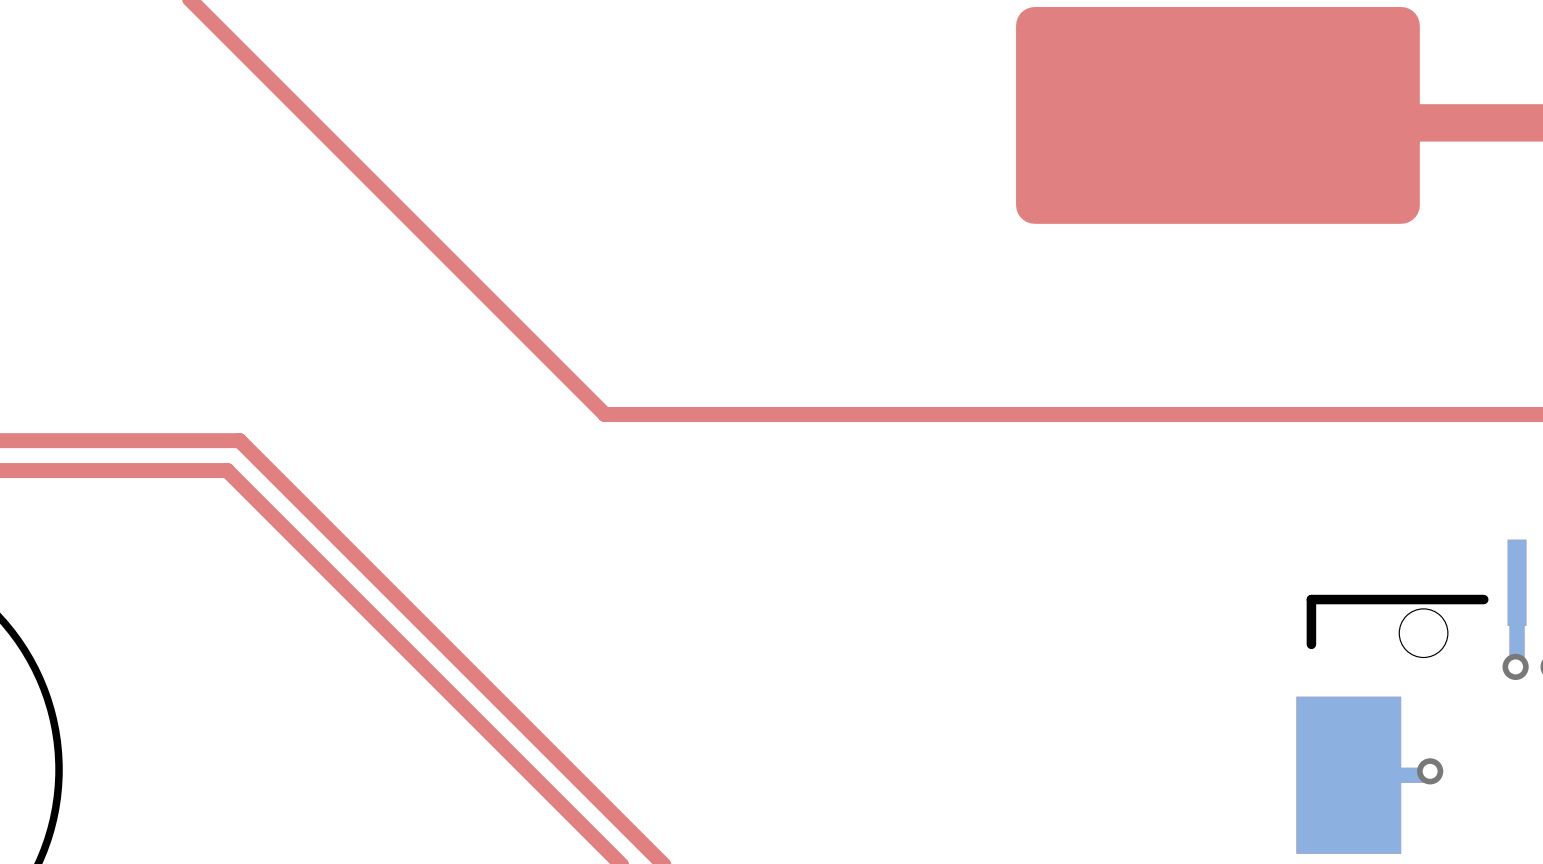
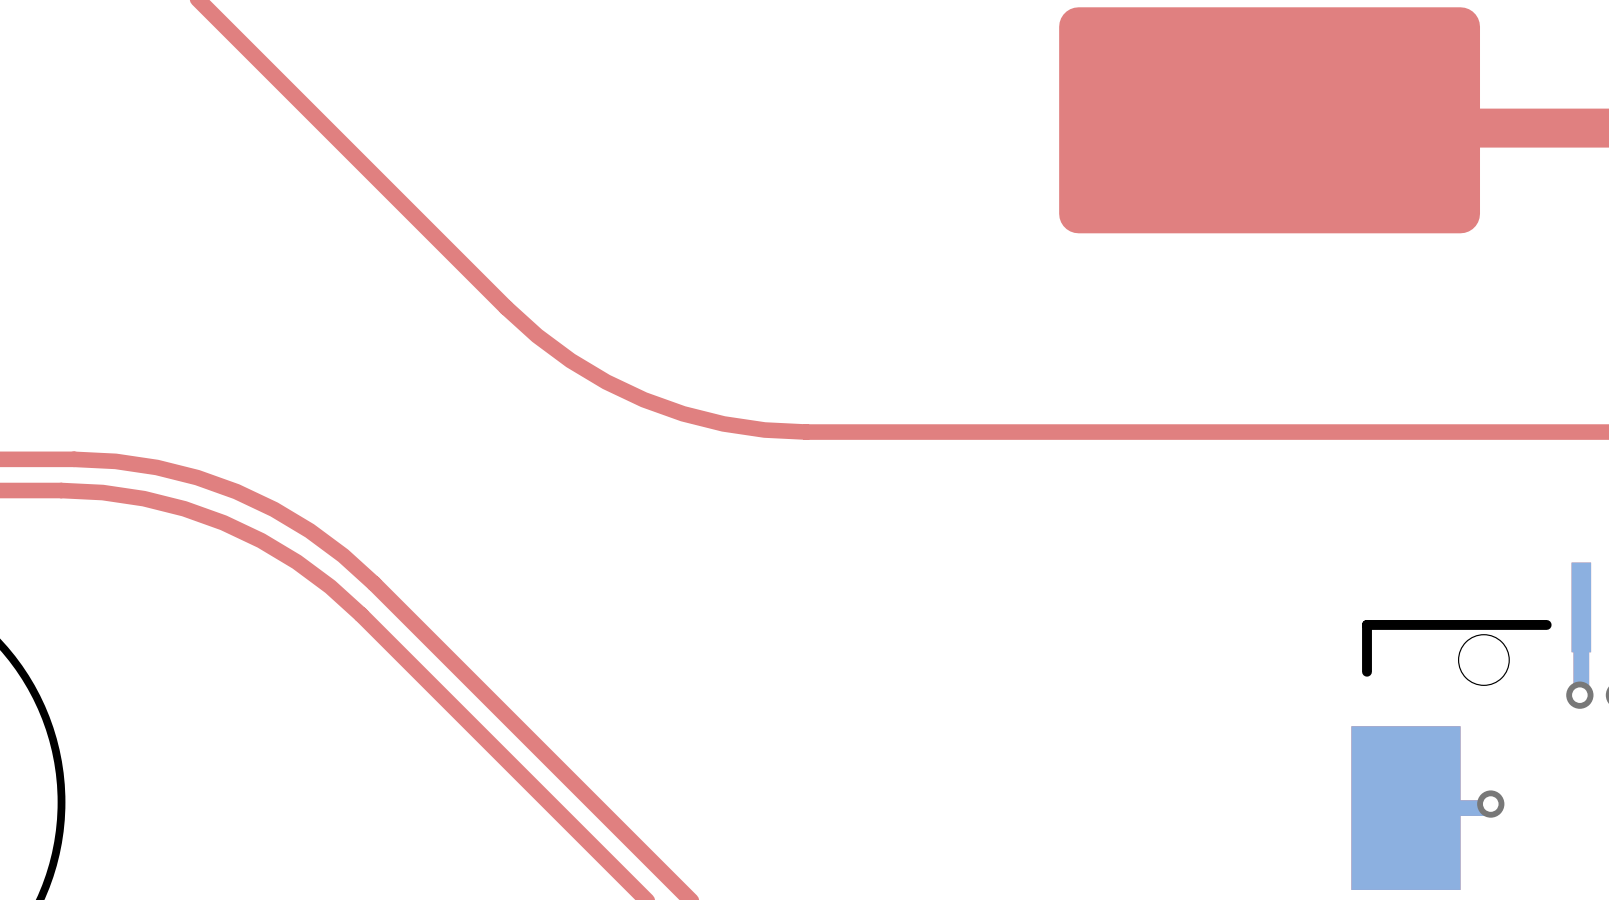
top track: (485, 295) (604, 414) (773, 414) -> (506, 307) (537, 335) (570, 360) (606, 381) (643, 399) (683, 413) (723, 423) (764, 430) (806, 432)
top track: (71, 440) (239, 440) (358, 559) -> (74, 459) (115, 461) (156, 467) (197, 477) (236, 491) (274, 509) (309, 530) (343, 555) (374, 583)
top track: (58, 470) (227, 470) (346, 589) -> (61, 490) (102, 492) (143, 498) (184, 508) (223, 522) (261, 540) (296, 561) (330, 586) (361, 614)

